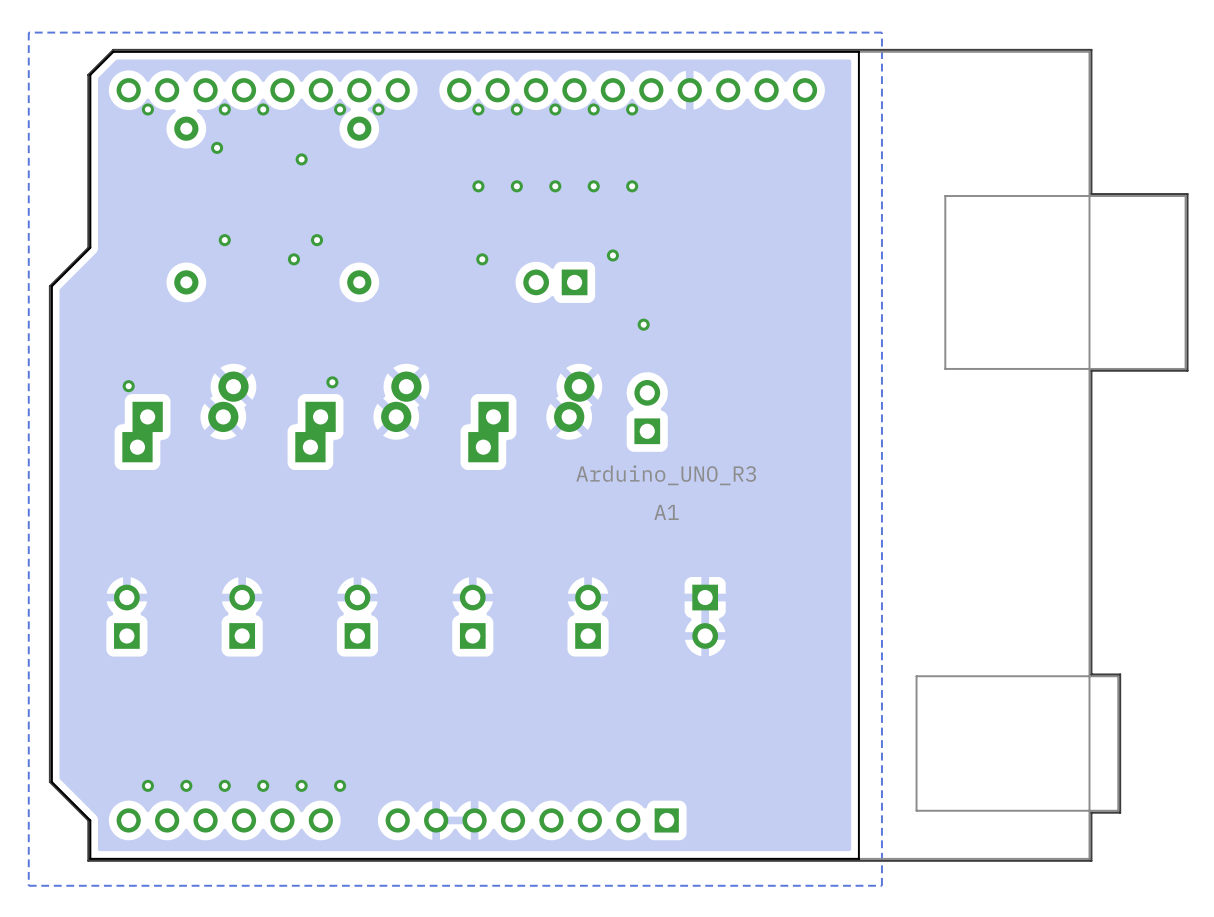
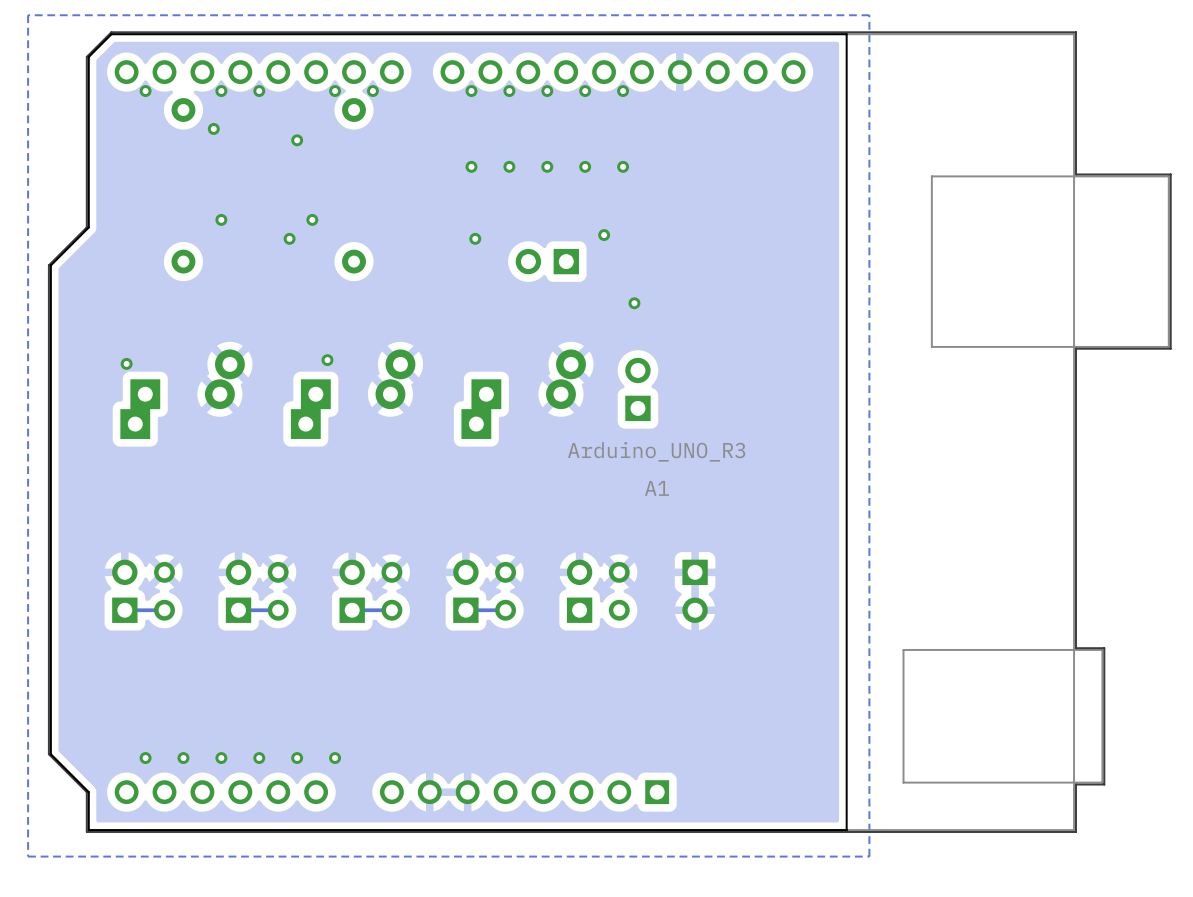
part: none -> (164, 591)
part: none -> (278, 591)
part: none -> (391, 591)
part: none -> (505, 591)
part: none -> (619, 591)
track: none -> (164, 610) (124, 610)
track: none -> (278, 610) (238, 610)
track: none -> (391, 610) (352, 610)
track: none -> (505, 610) (465, 610)

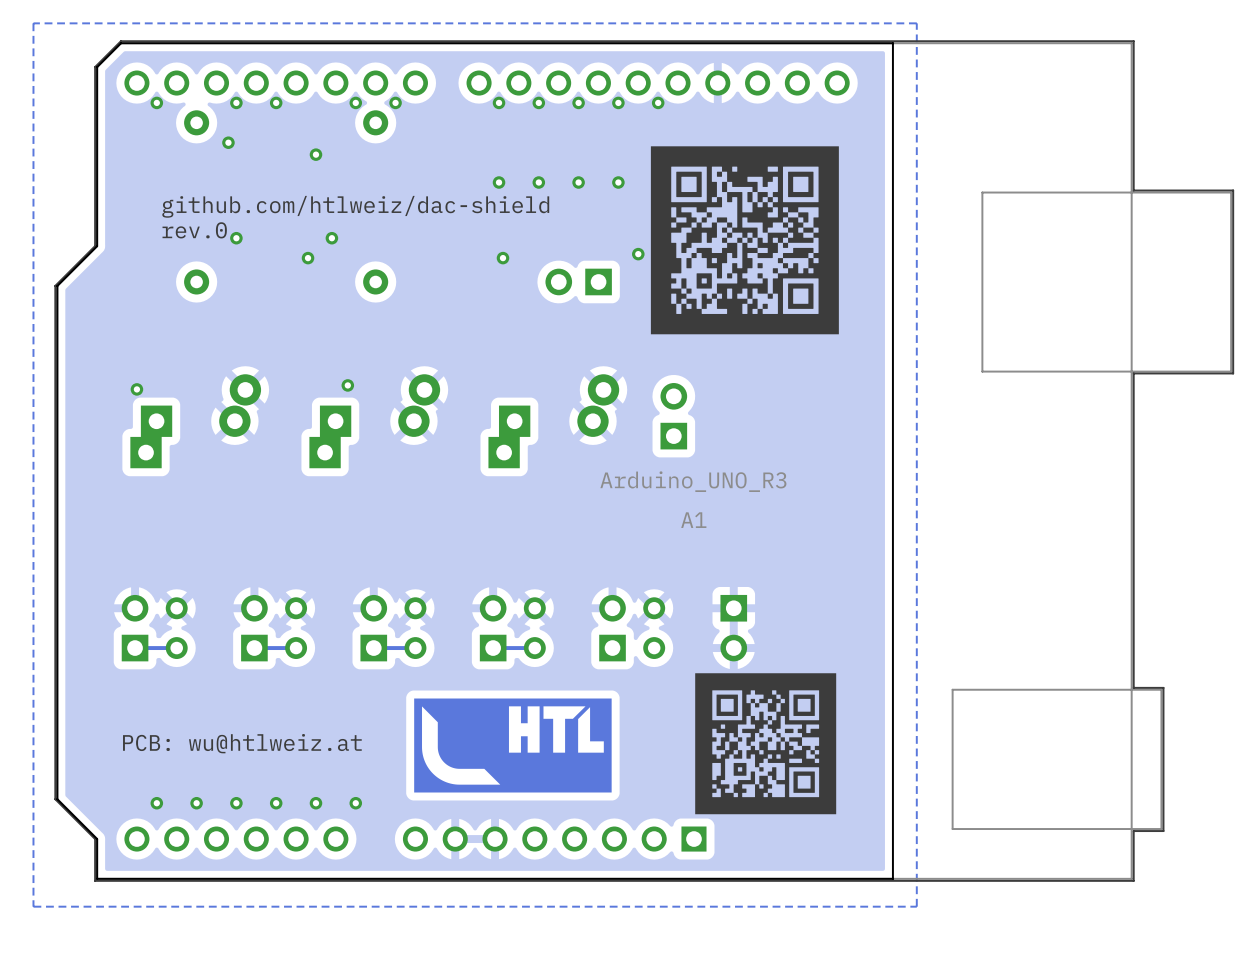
drawing: none -> [650, 146, 839, 335]
text: none -> github.com/htlweiz/dac-shield (355, 206)
text: none -> rev.0 (194, 230)
drawing: none -> [695, 673, 837, 815]
drawing: none -> [414, 698, 612, 793]
text: none -> PCB: wu@htlweiz.at (242, 743)

